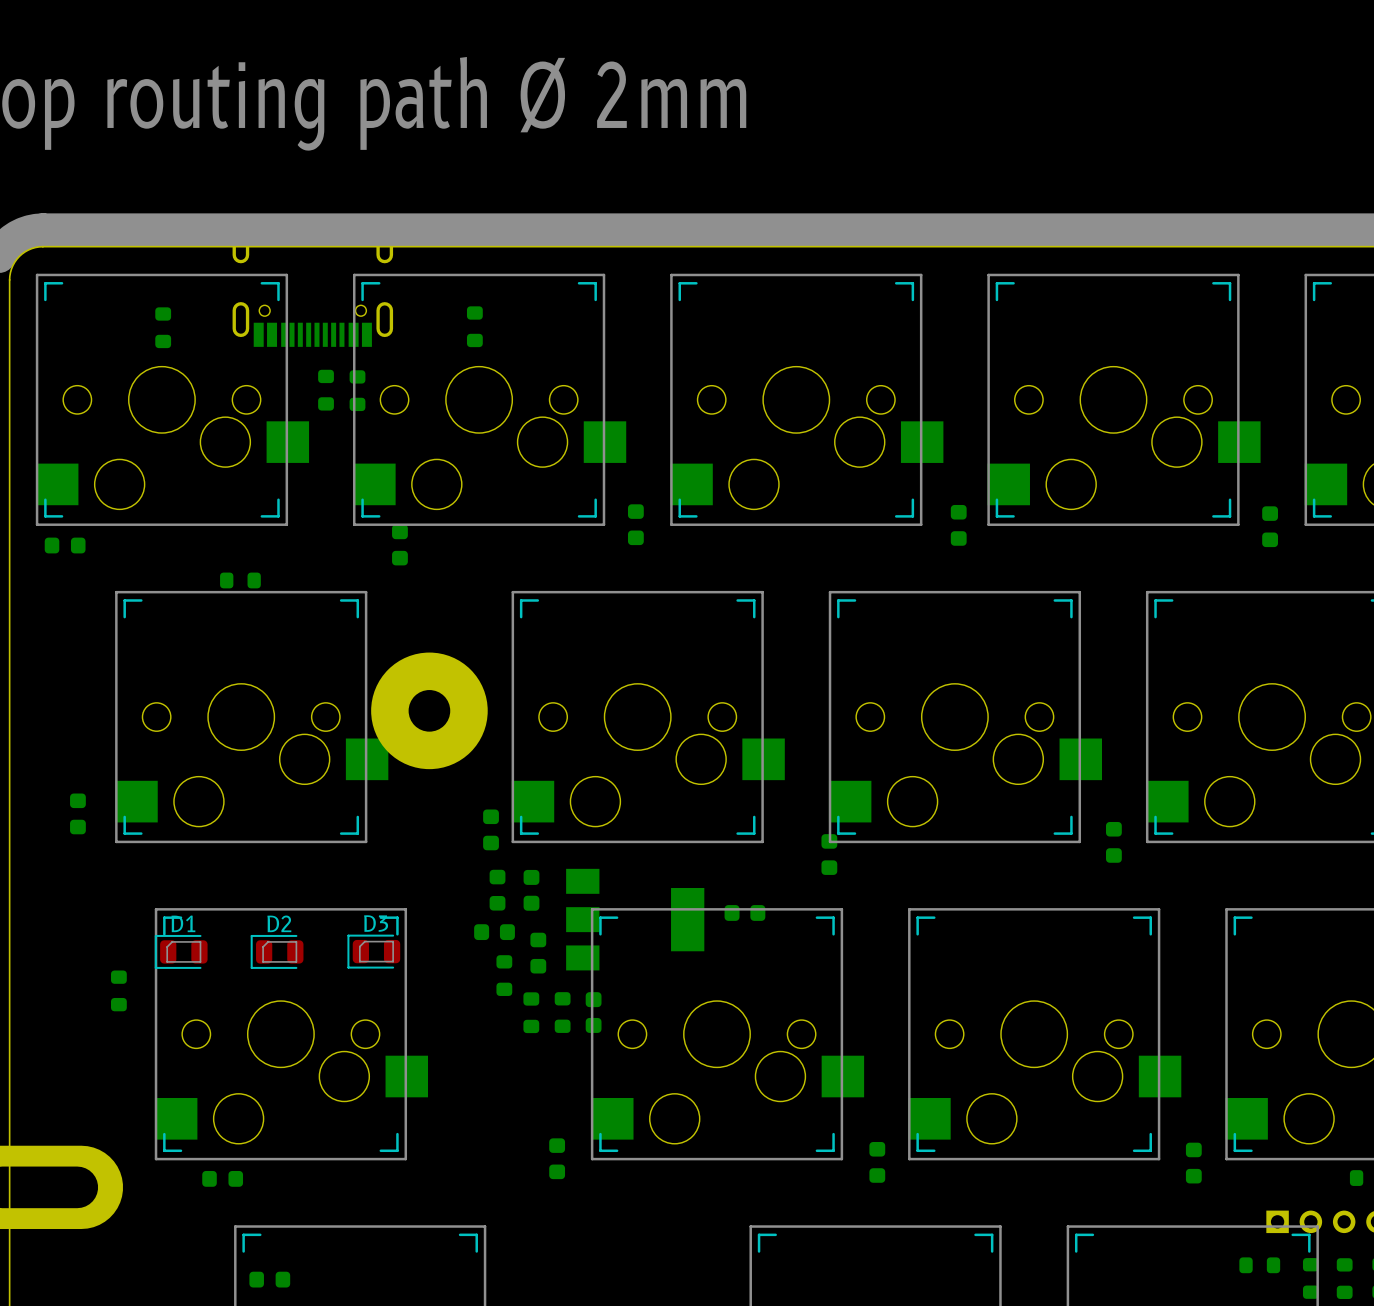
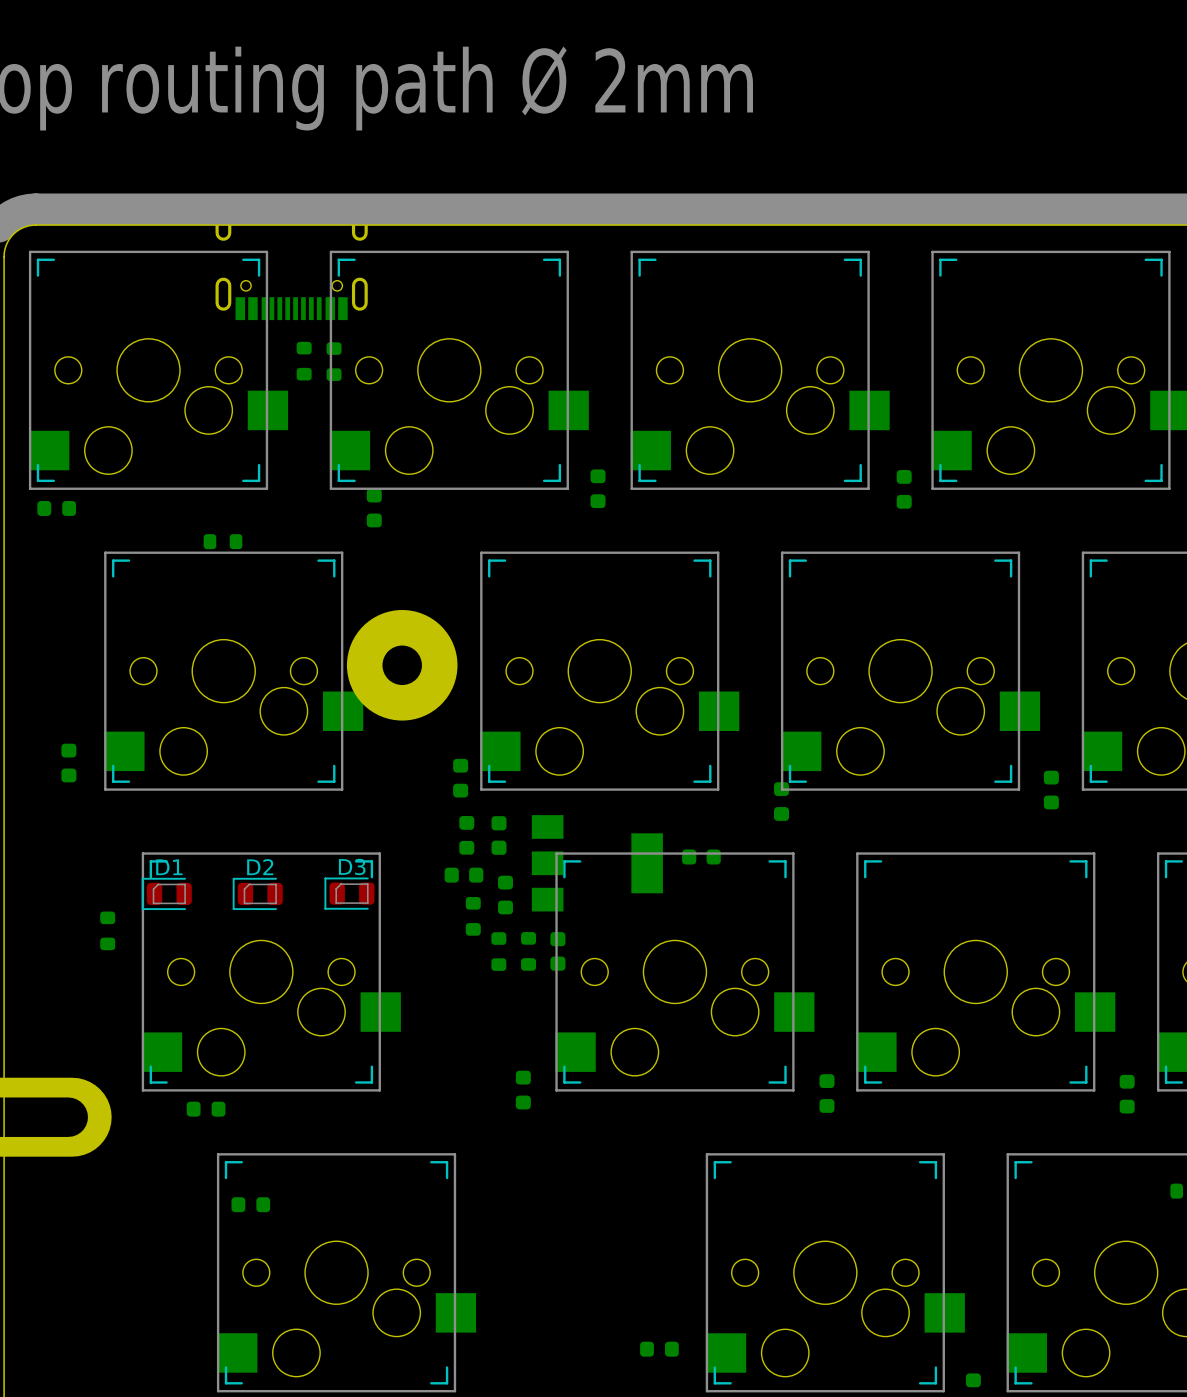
part: (474, 326) -> none
part: (163, 327) -> none

